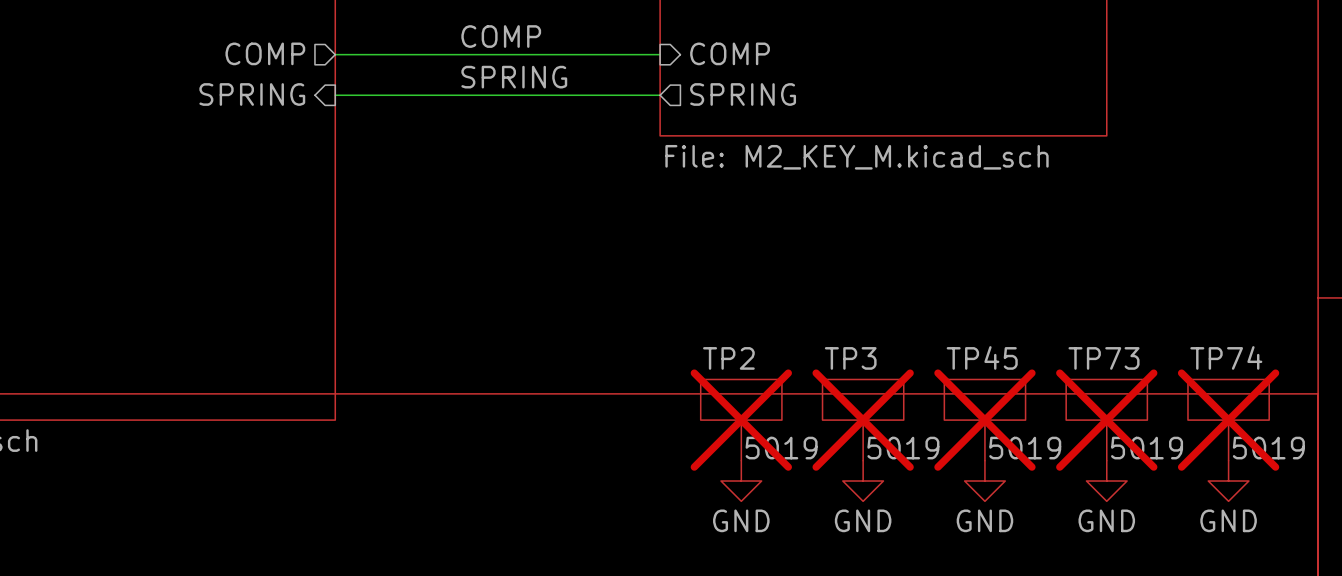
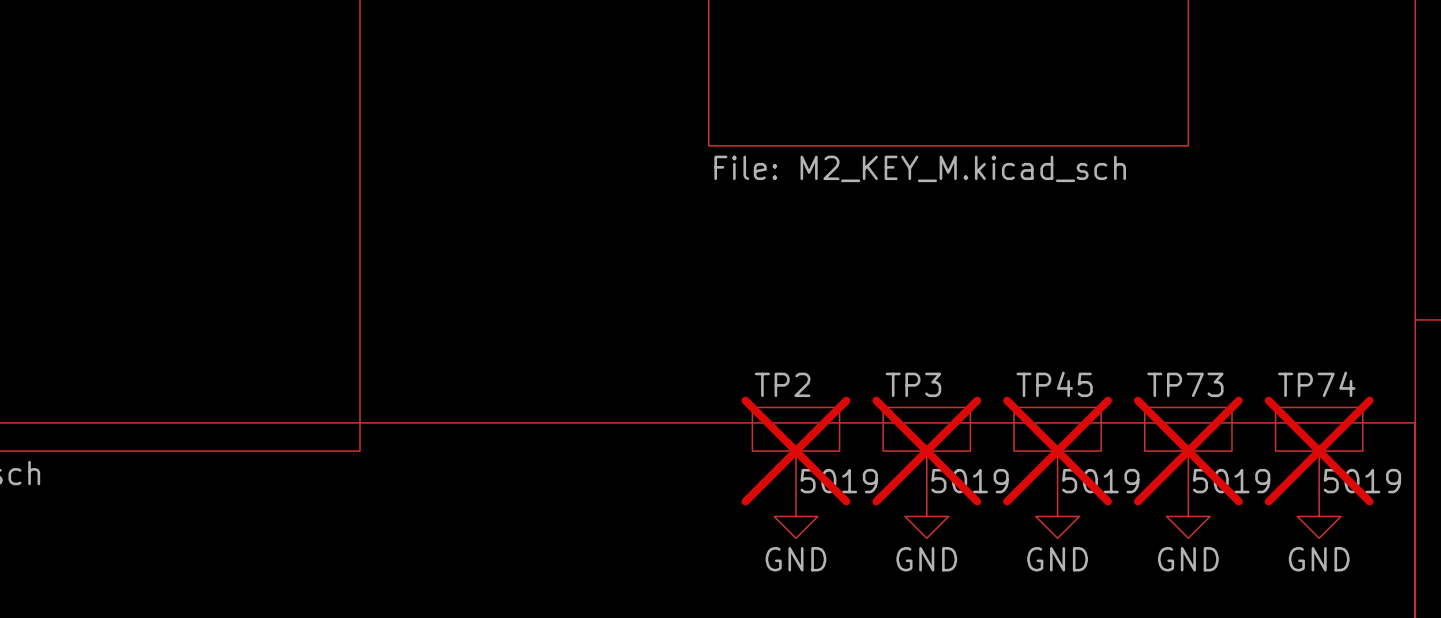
label: COMP (501, 36) -> none
sheet pin: COMP (265, 53) -> none
sheet pin: COMP (730, 53) -> none
wire: (335, 54) (660, 54) -> none
label: SPRING (514, 77) -> none
sheet pin: SPRING (252, 94) -> none
sheet pin: SPRING (743, 94) -> none
wire: (335, 95) (660, 95) -> none

